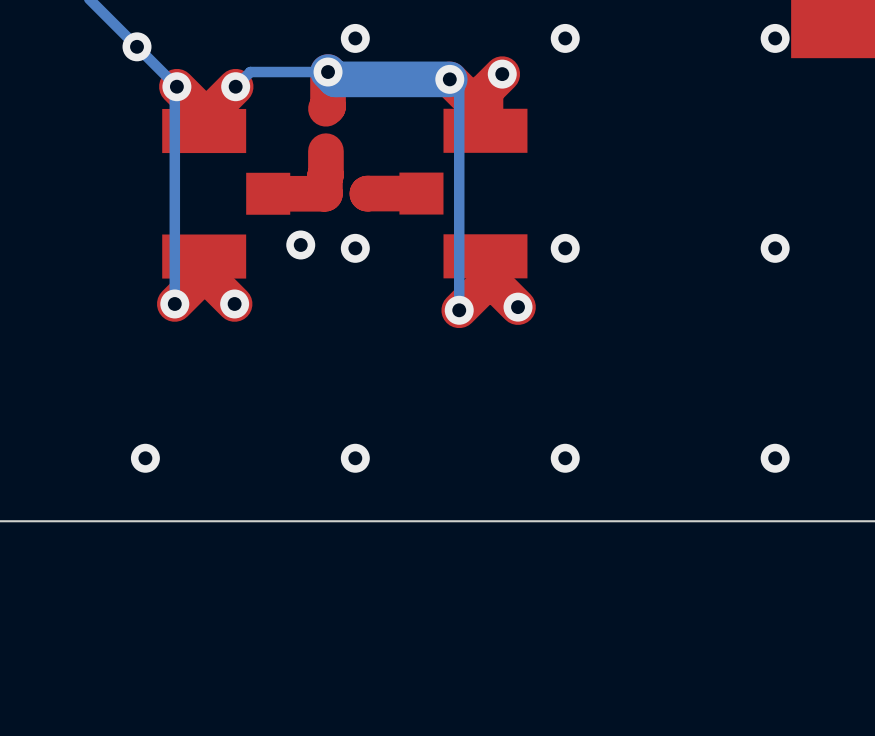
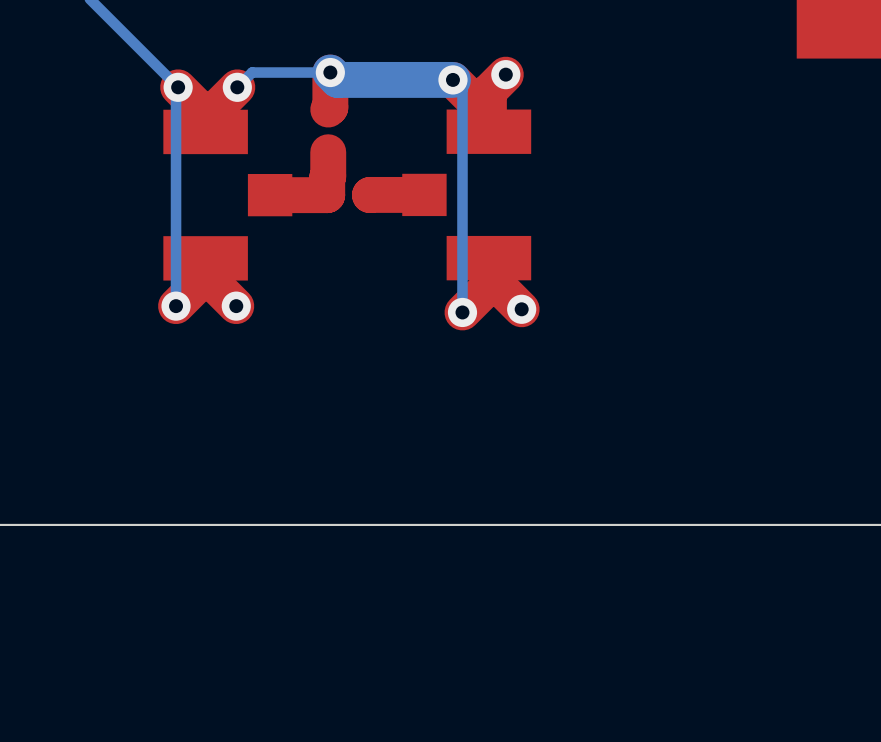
via: (355, 38) -> none
via: (565, 38) -> none
via: (775, 38) -> none
via: (137, 46) -> none
via: (300, 244) -> none
via: (355, 248) -> none
via: (565, 248) -> none
via: (775, 248) -> none
via: (145, 458) -> none
via: (355, 458) -> none
via: (565, 458) -> none
via: (775, 458) -> none

